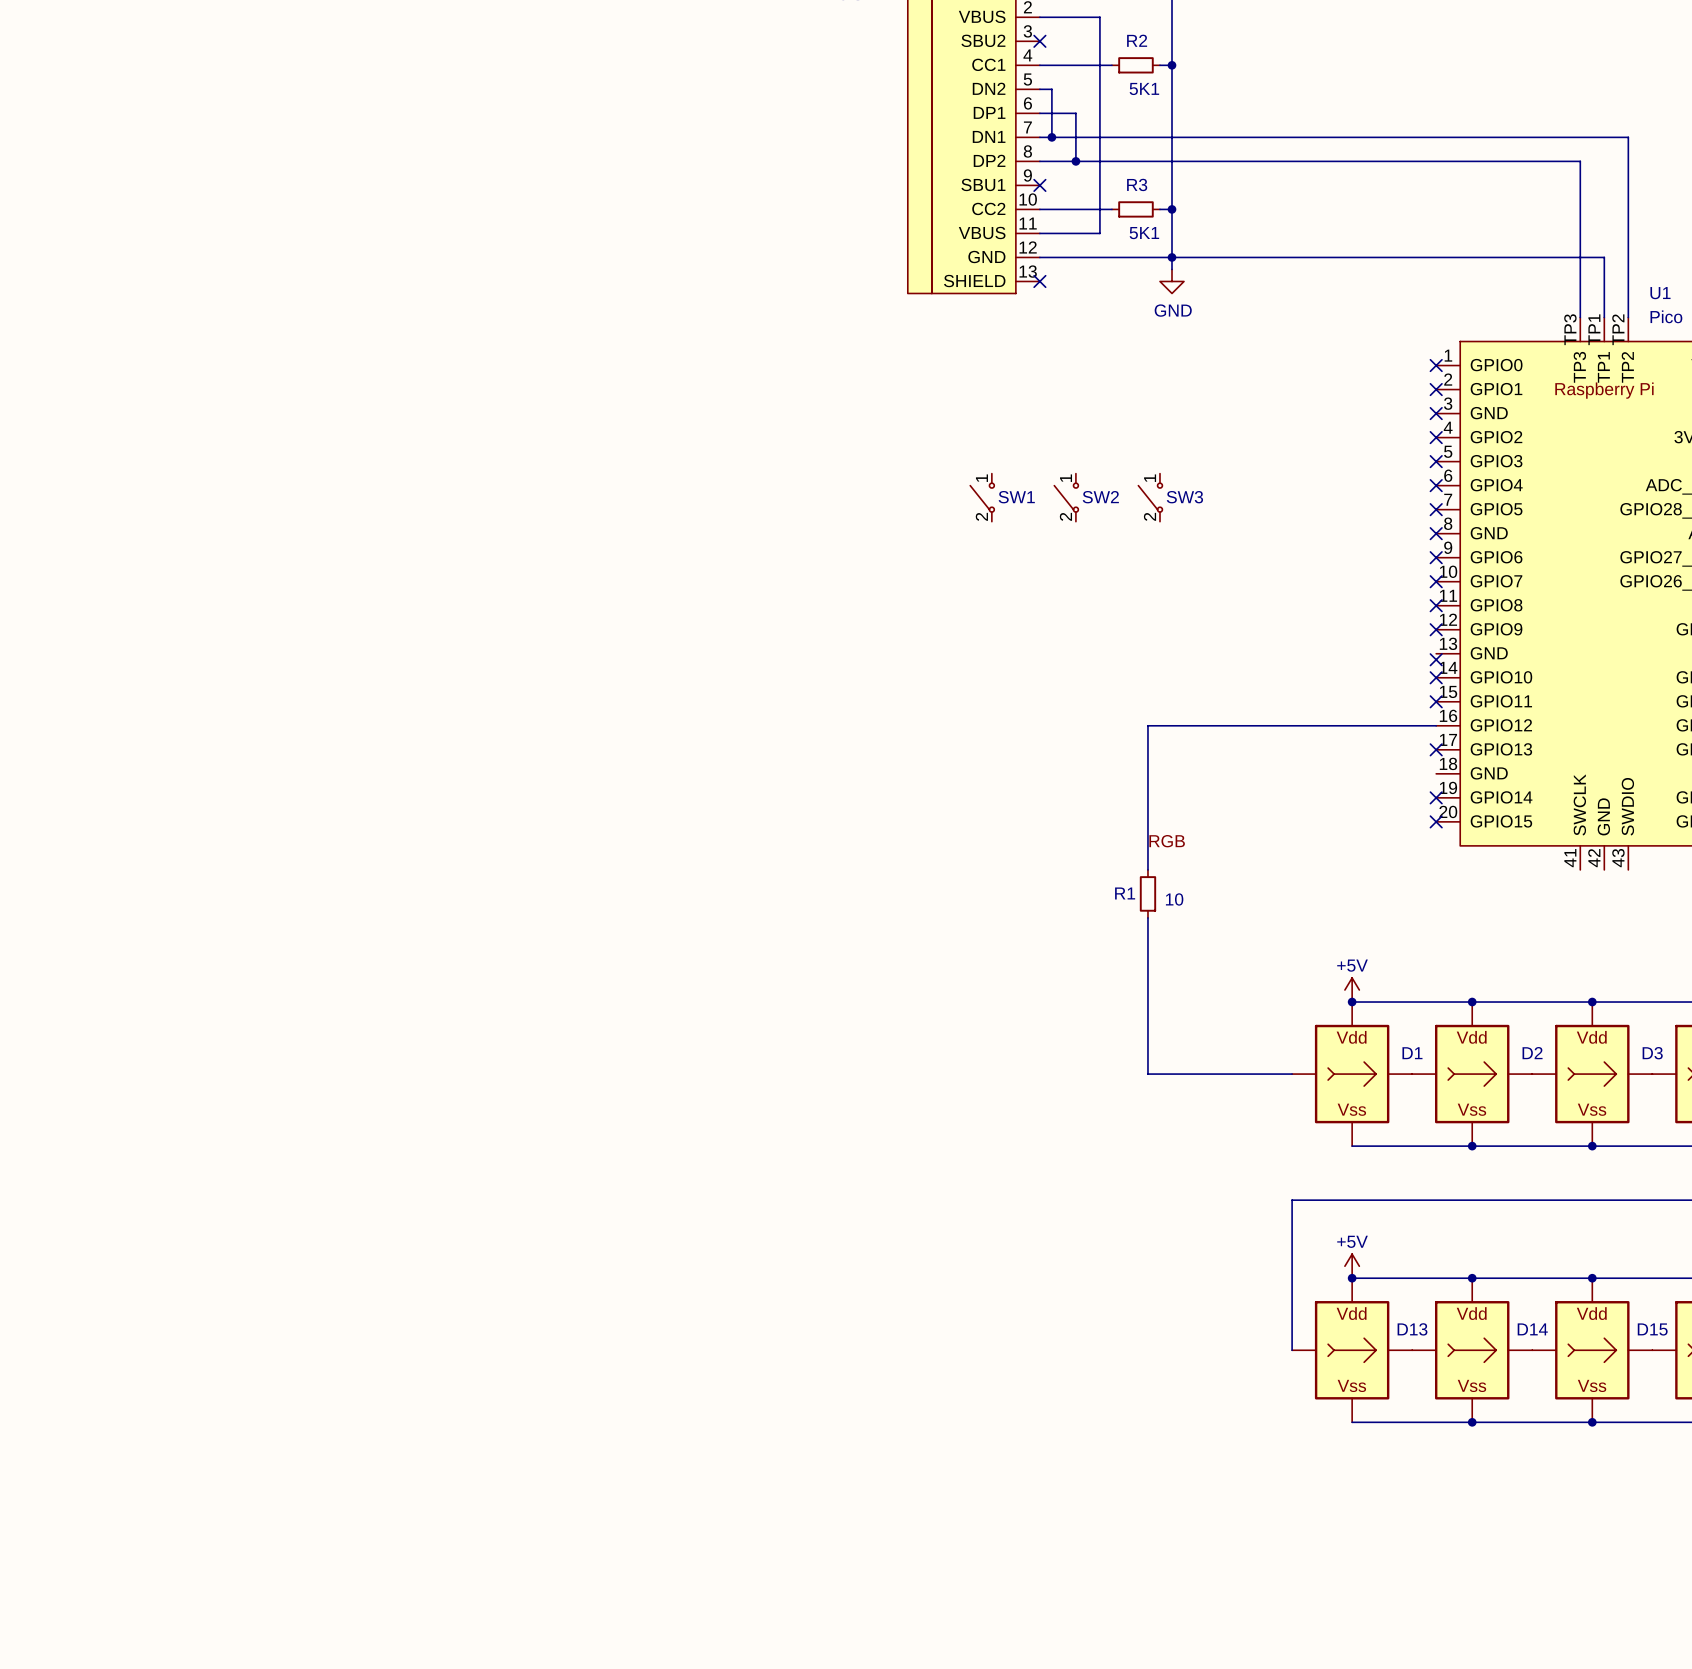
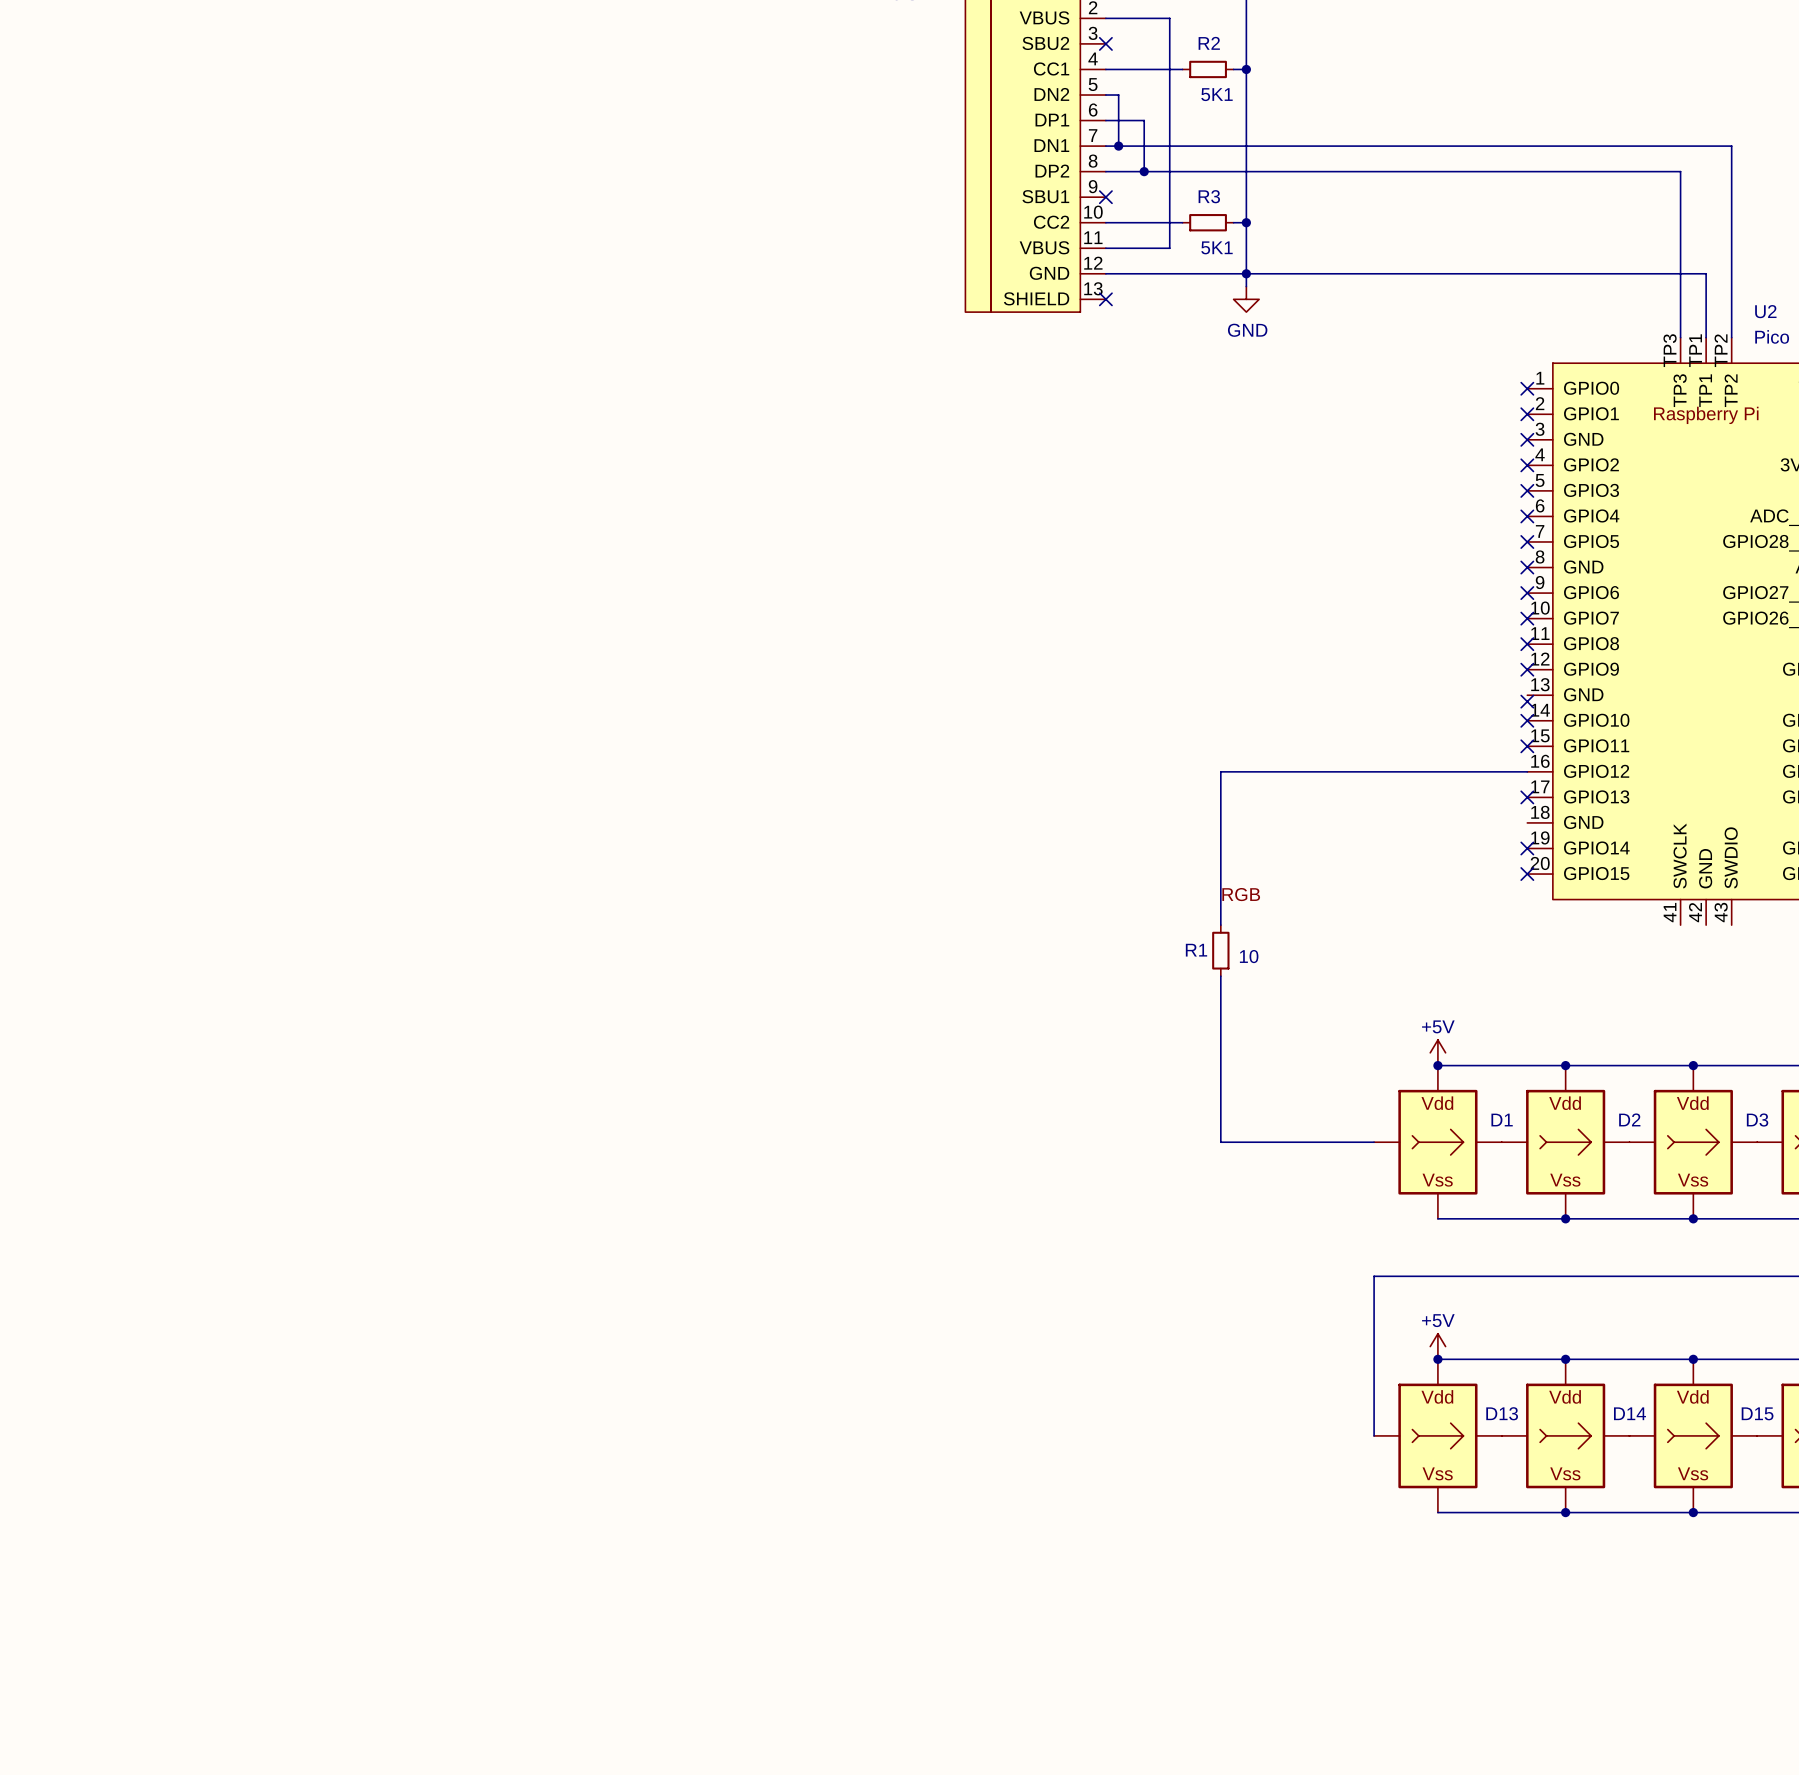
U1 name: U1 (1660, 293) -> U2 (1765, 311)
SW1: (982, 497) -> none
SW2: (1066, 497) -> none
SW3: (1150, 497) -> none

